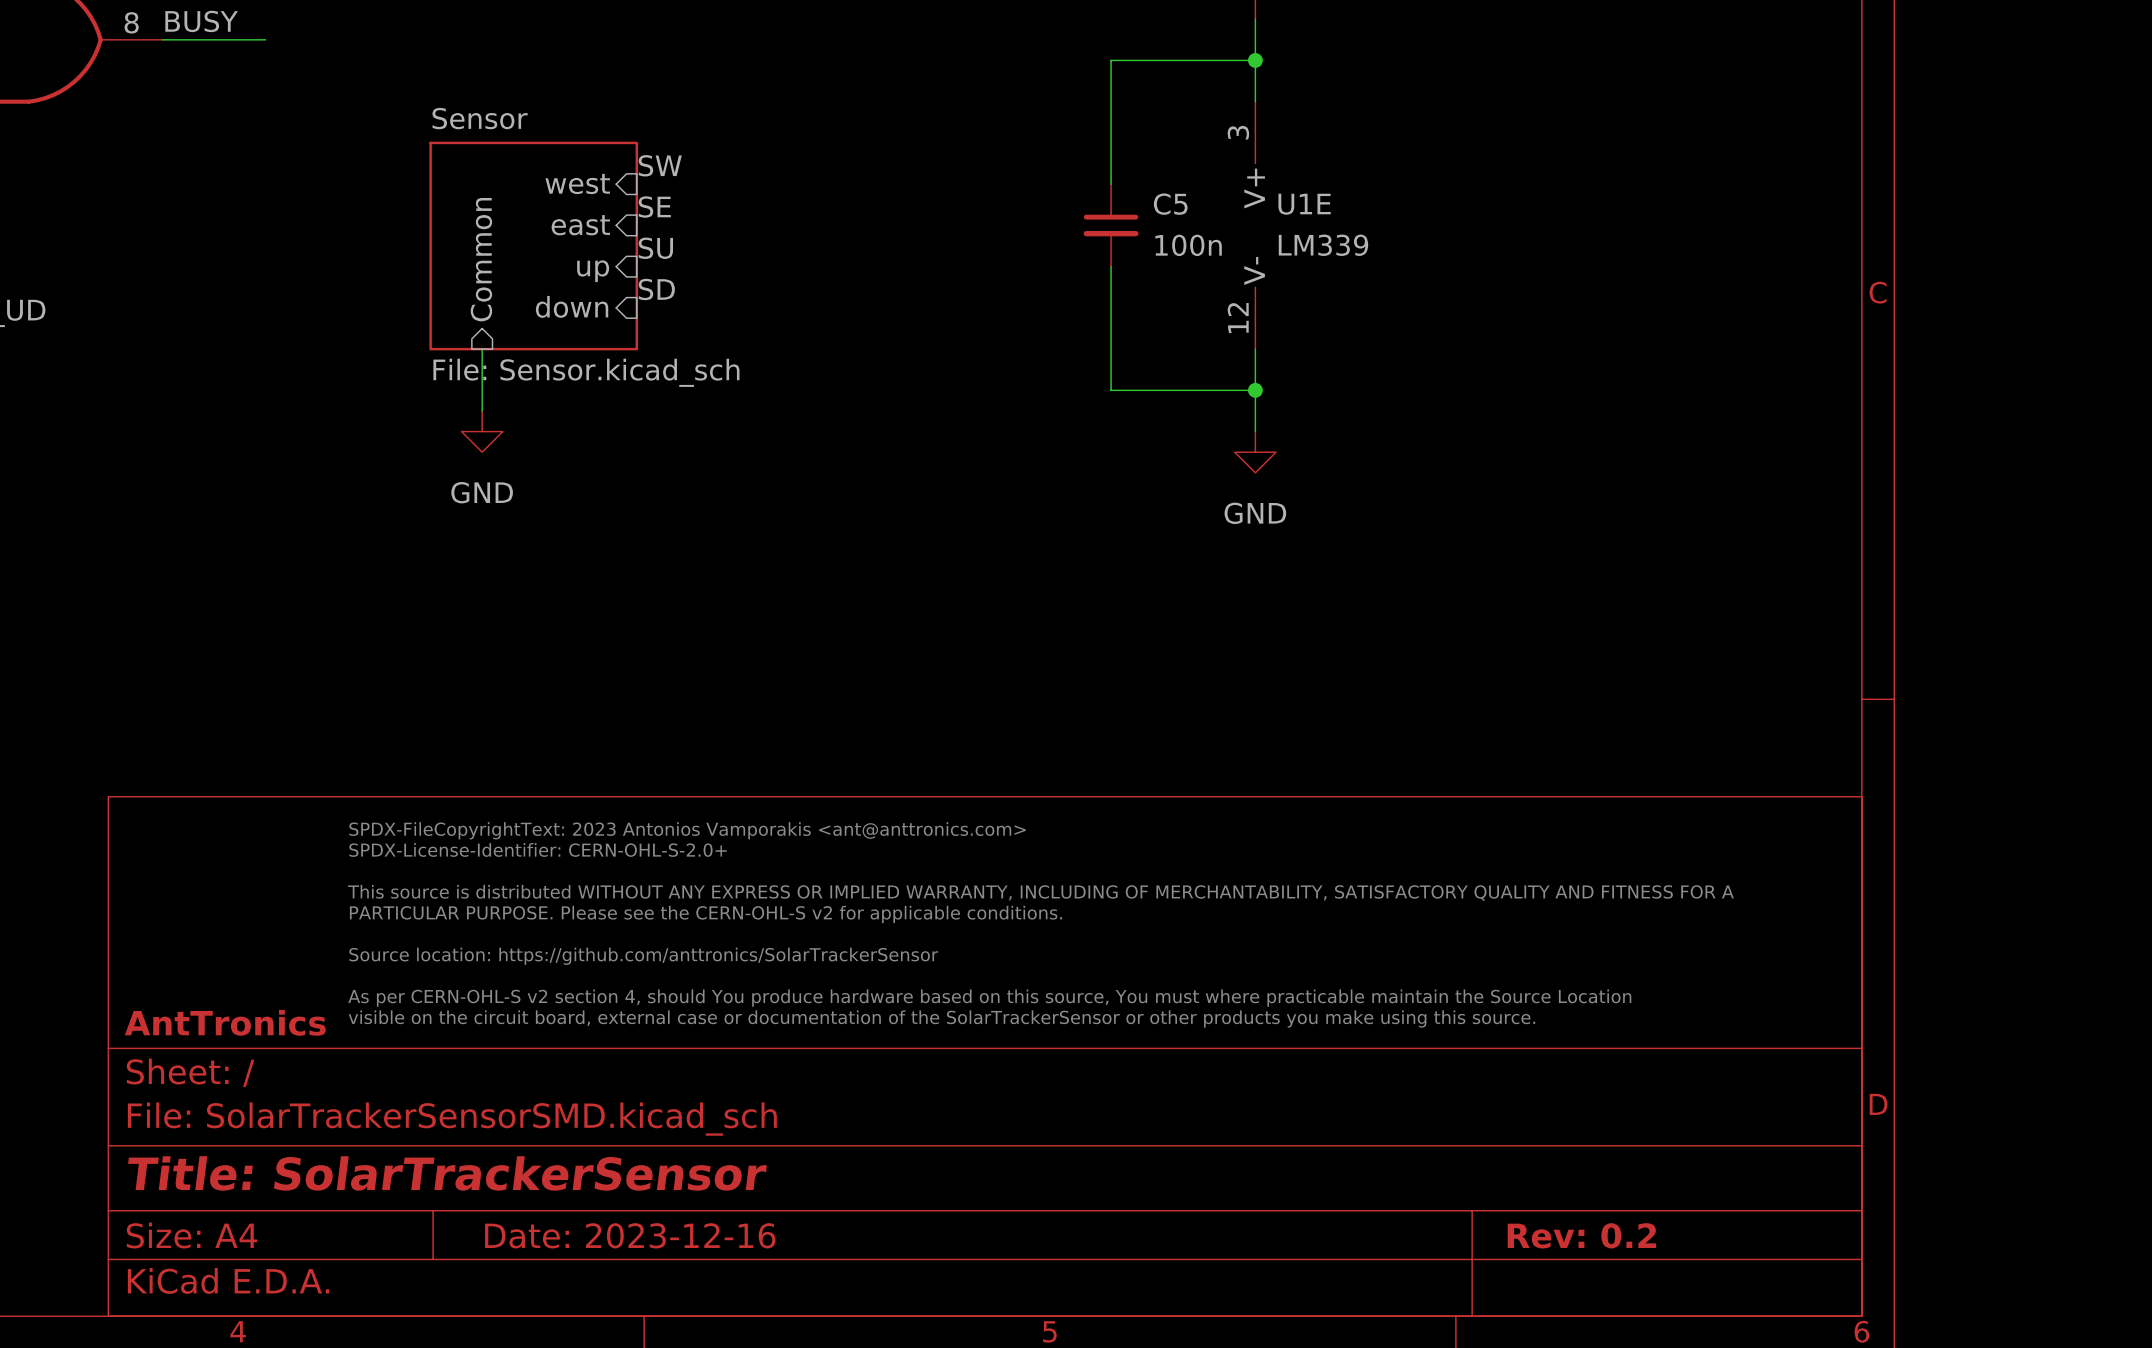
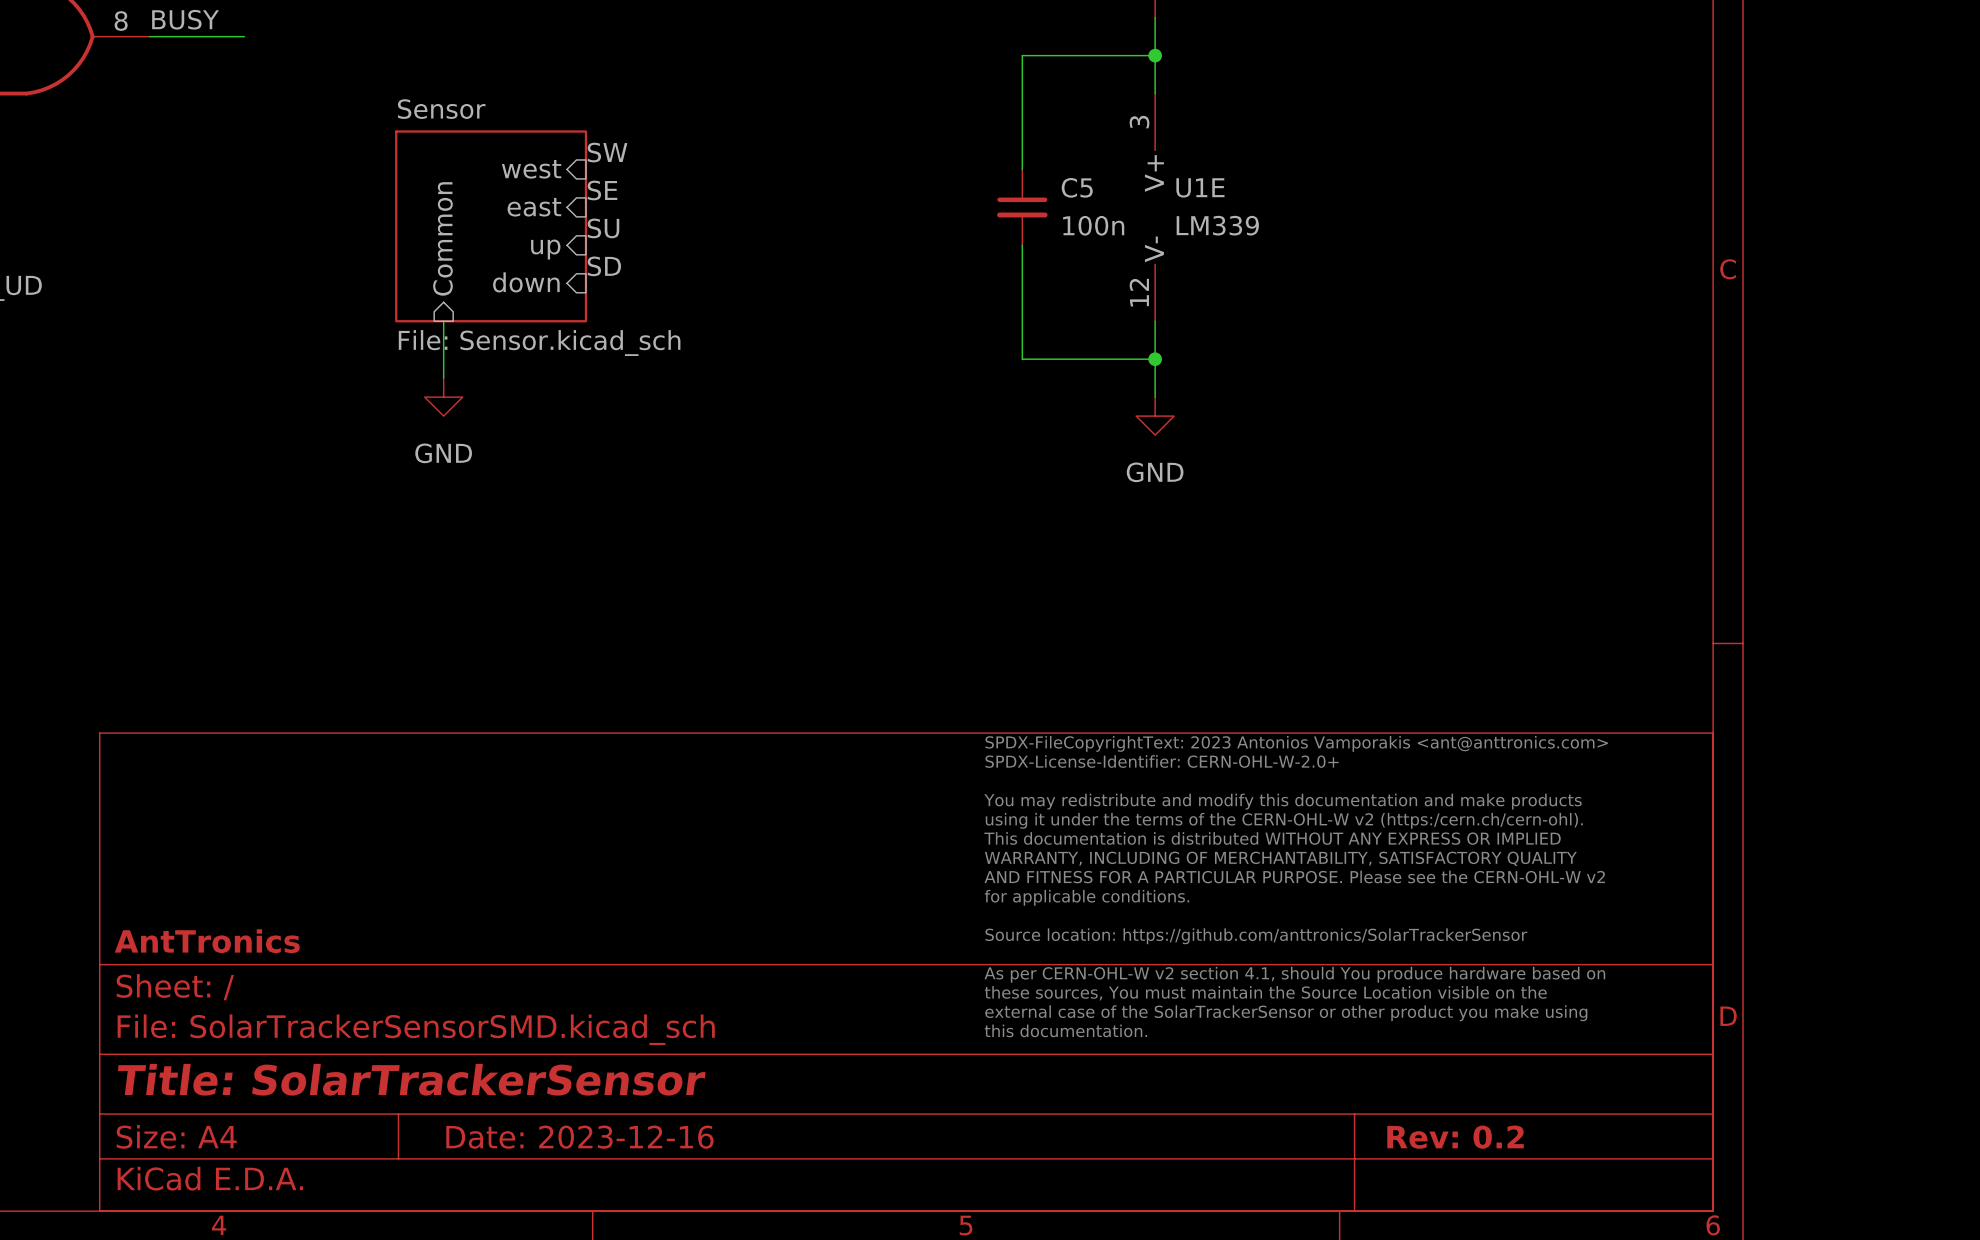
text: none -> SPDX-FileCopyrightText: 2023 Antonios Vamporakis <ant@anttronics.com> (1296, 743)
text: none -> SPDX-License-Identifier: CERN-OHL-W-2.0+ (1162, 761)
text: SPDX-FileCopyrightText: 2023 Antonios Vamporakis <ant@anttronics.com> (687, 830) -> none
text: SPDX-License-Identifier: CERN-OHL-S-2.0+ (538, 849) -> none
text: none -> You may redistribute and modify this documentation and make products (1283, 801)
text: This source is distributed WITHOUT ANY EXPRESS OR IMPLIED WARRANTY, INCLUDING OF MERCHANTABILITY, SATISFACTORY QUALITY AND FITNESS FOR A (1040, 892) -> none
text: none -> using it under the terms of the CERN-OHL-W v2 (https:/cern.ch/cern-ohl). (1284, 820)
text: none -> This documentation is distributed WITHOUT ANY EXPRESS OR IMPLIED (1272, 838)
text: PARTICULAR PURPOSE. Please see the CERN-OHL-S v2 for applicable conditions. (705, 914) -> none
text: none -> WARRANTY, INCLUDING OF MERCHANTABILITY, SATISFACTORY QUALITY (1280, 858)
text: none -> AND FITNESS FOR A PARTICULAR PURPOSE. Please see the CERN-OHL-W v2 (1294, 876)
text: Source location: https://github.com/anttronics/SolarTrackerSensor (643, 956) -> none
text: none -> for applicable conditions. (1086, 897)
text: As per CERN-OHL-S v2 section 4, should You produce hardware based on this source, You must where practicable maintain the Source Location (989, 998) -> none
text: none -> Source location: https://github.com/anttronics/SolarTrackerSensor (1256, 936)
text: visible on the circuit board, external case or documentation of the SolarTrackerSensor or other products you make using this source. (941, 1018) -> none
text: none -> As per CERN-OHL-W v2 section 4.1, should You produce hardware based on (1294, 974)
text: none -> these sources, You must maintain the Source Location visible on the (1265, 993)
text: none -> external case of the SolarTrackerSensor or other product you make using (1286, 1013)
text: none -> this documentation. (1065, 1030)

